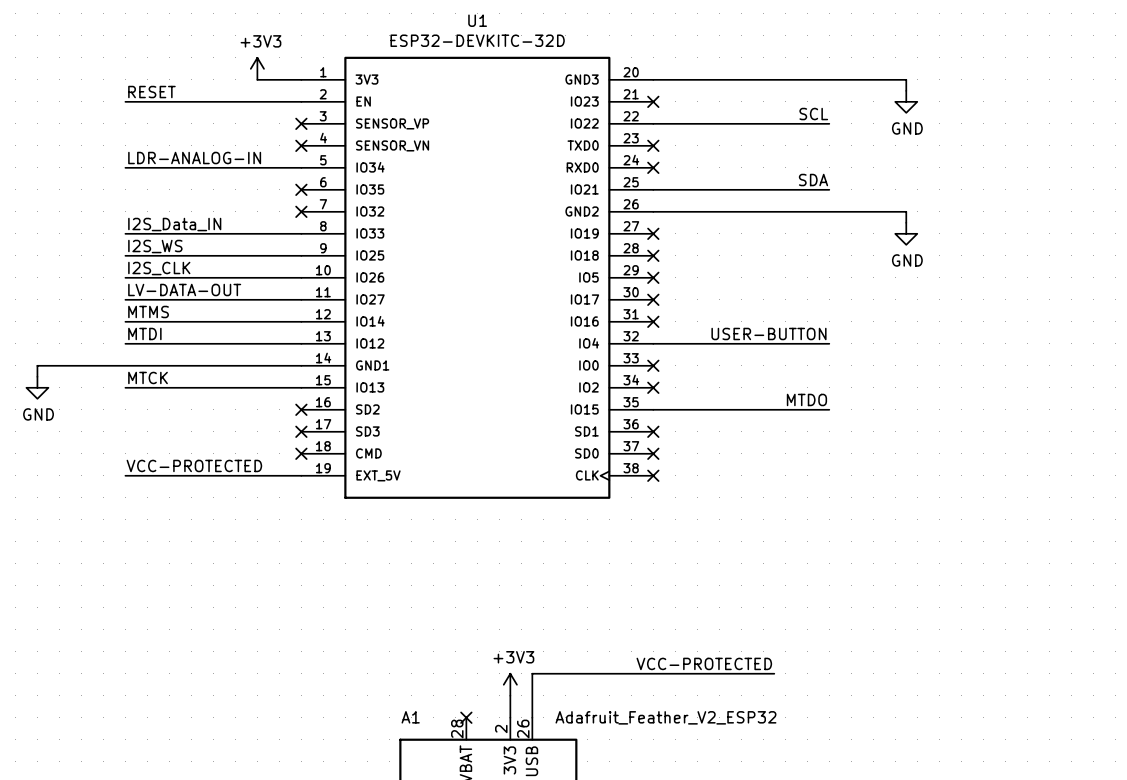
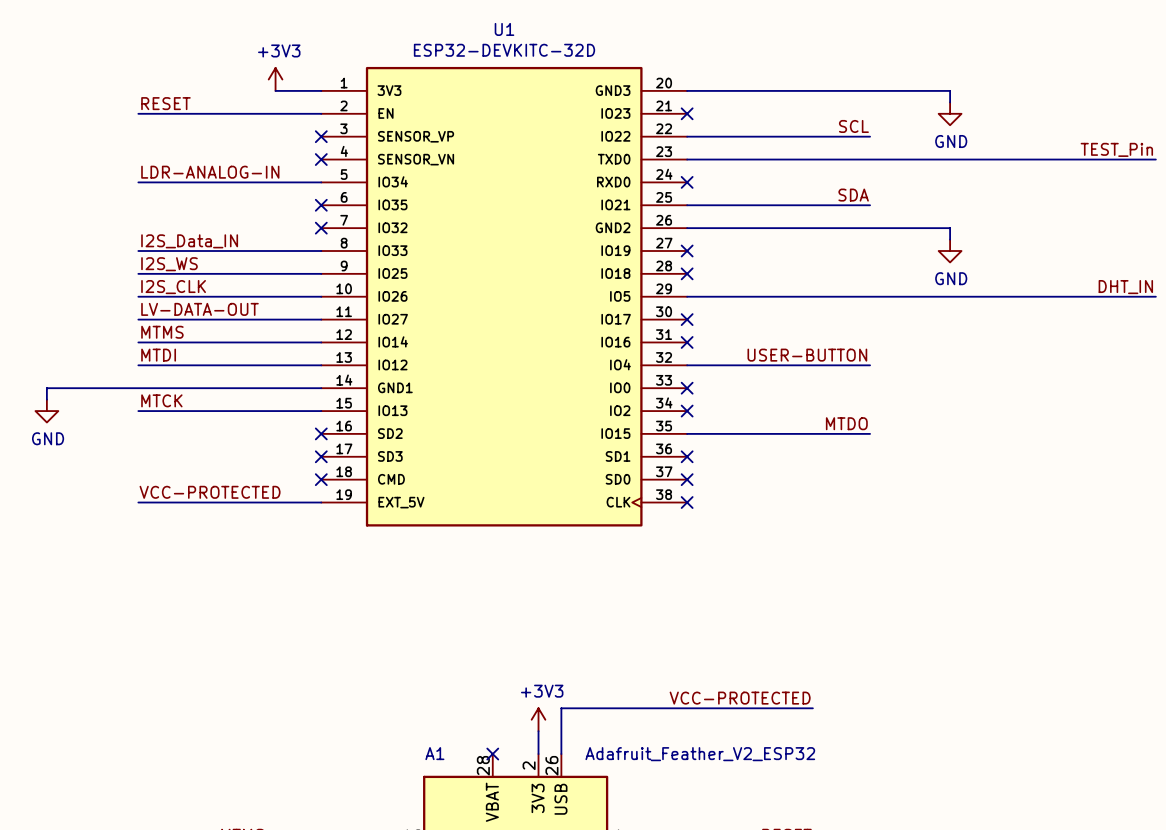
label: none -> TEST_Pin (1116, 149)
wire: none -> (687, 159) (1155, 159)
no-connect mark: (653, 145) -> none
label: none -> DHT_IN (1125, 287)
wire: none -> (687, 296) (1155, 296)
no-connect mark: (653, 277) -> none

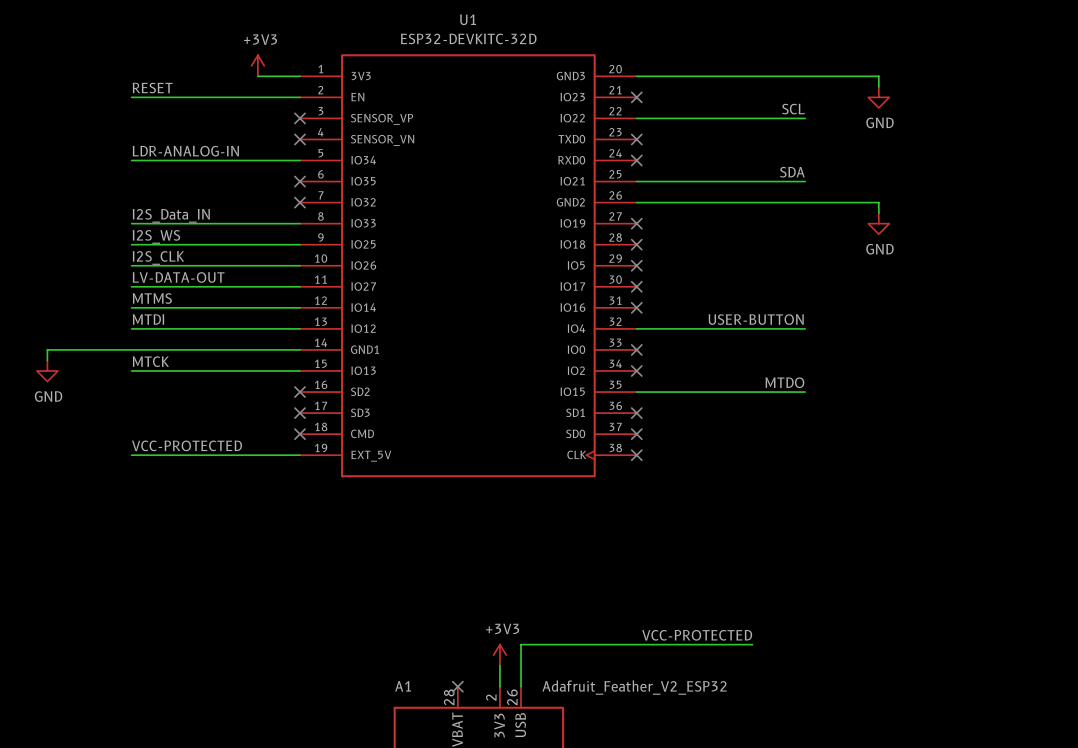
label: TEST_Pin (1116, 149) -> none
wire: (687, 159) (1155, 159) -> none
no-connect mark: none -> (636, 139)
label: DHT_IN (1125, 287) -> none
wire: (687, 296) (1155, 296) -> none
no-connect mark: none -> (636, 265)

